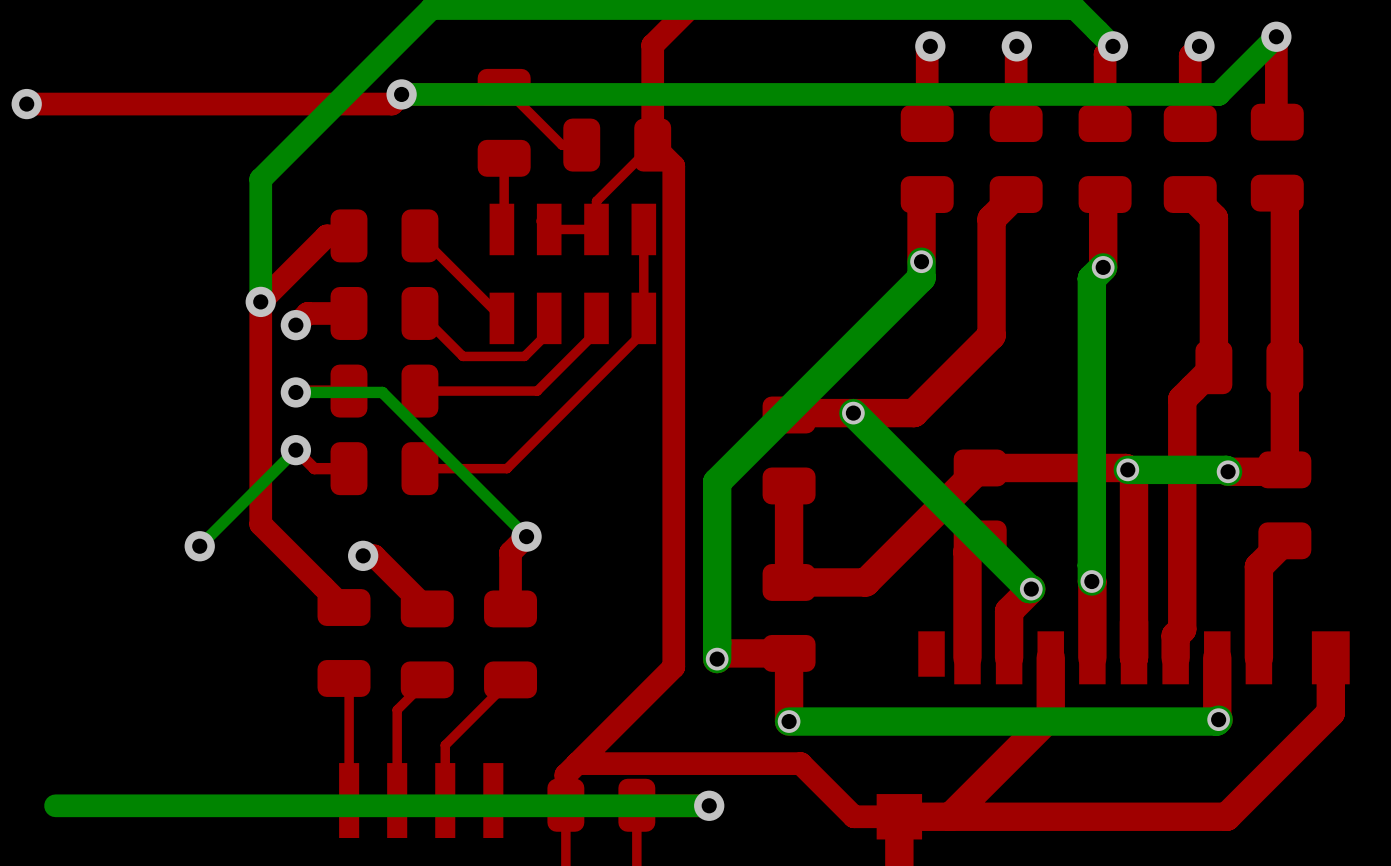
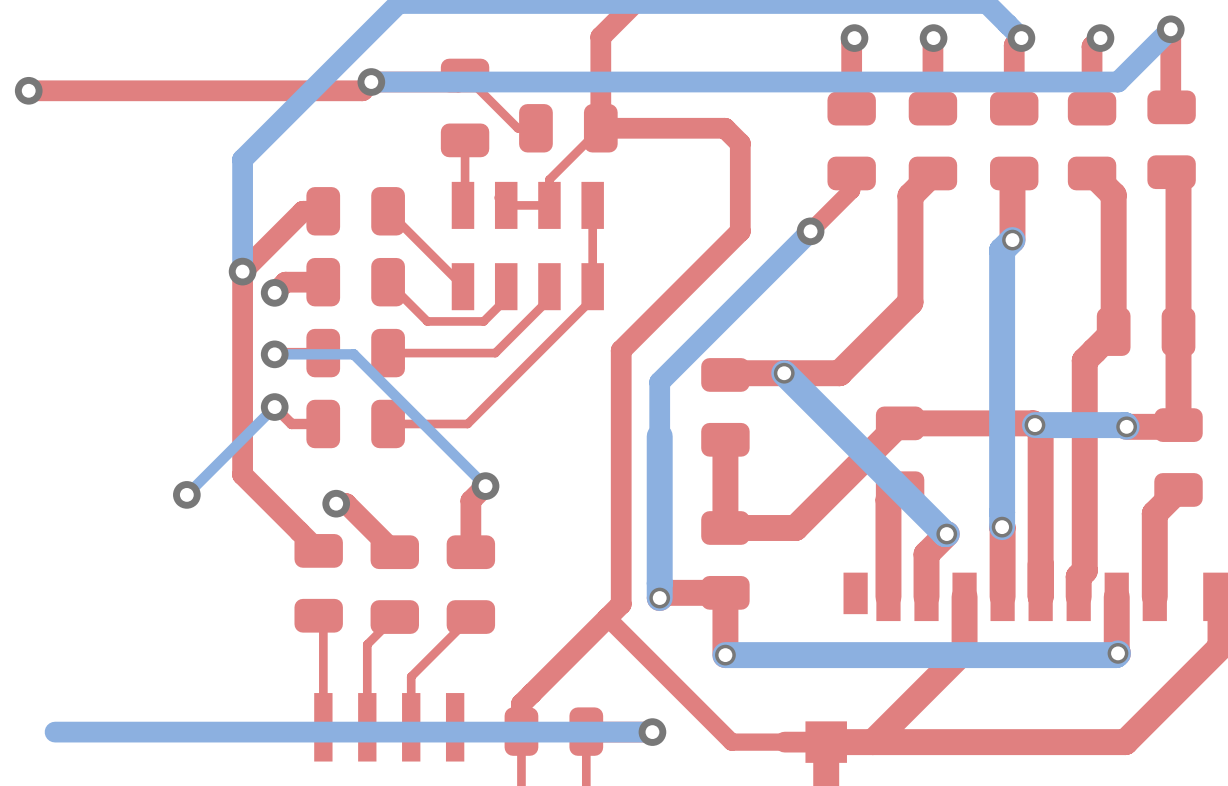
top track: (652, 145) (673, 166) (673, 667) -> (600, 128) (725, 128) (740, 143) (740, 231) (621, 350) (620, 605)
top track: none -> (851, 173) (851, 190) (810, 231)
top track: (921, 200) (921, 261) -> none
via: none -> (810, 231)
bottom track: (921, 261) (921, 277) (717, 482) -> (810, 231) (659, 382) (659, 436)
via: (921, 261) -> none
top track: (577, 763) (800, 763) (853, 816) -> (607, 617) (731, 742) (784, 742)

